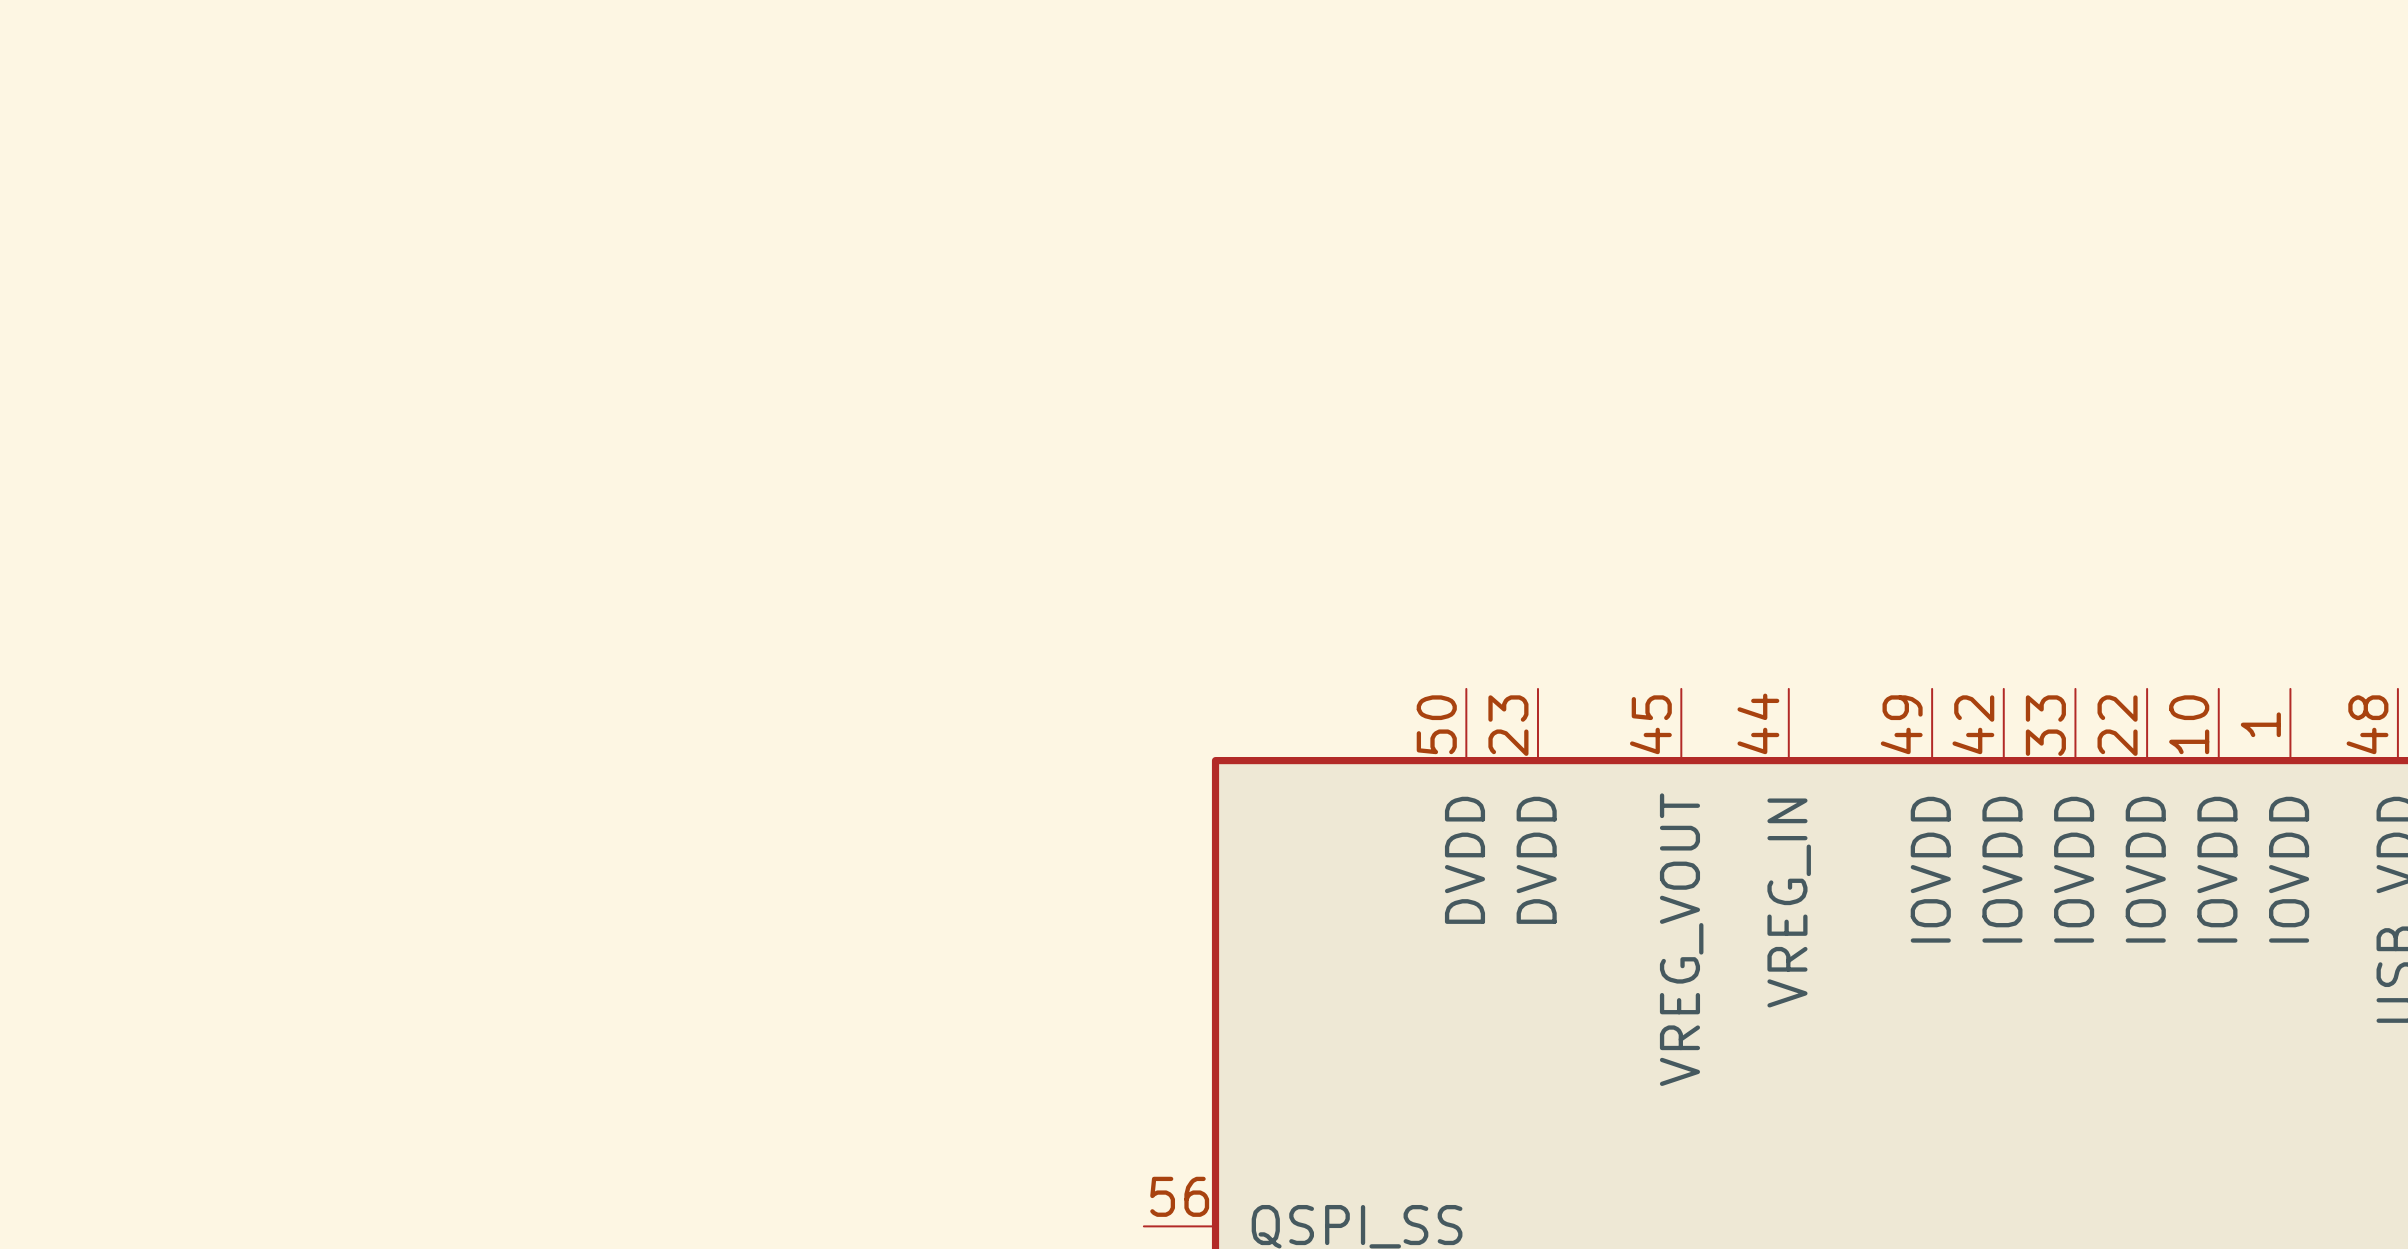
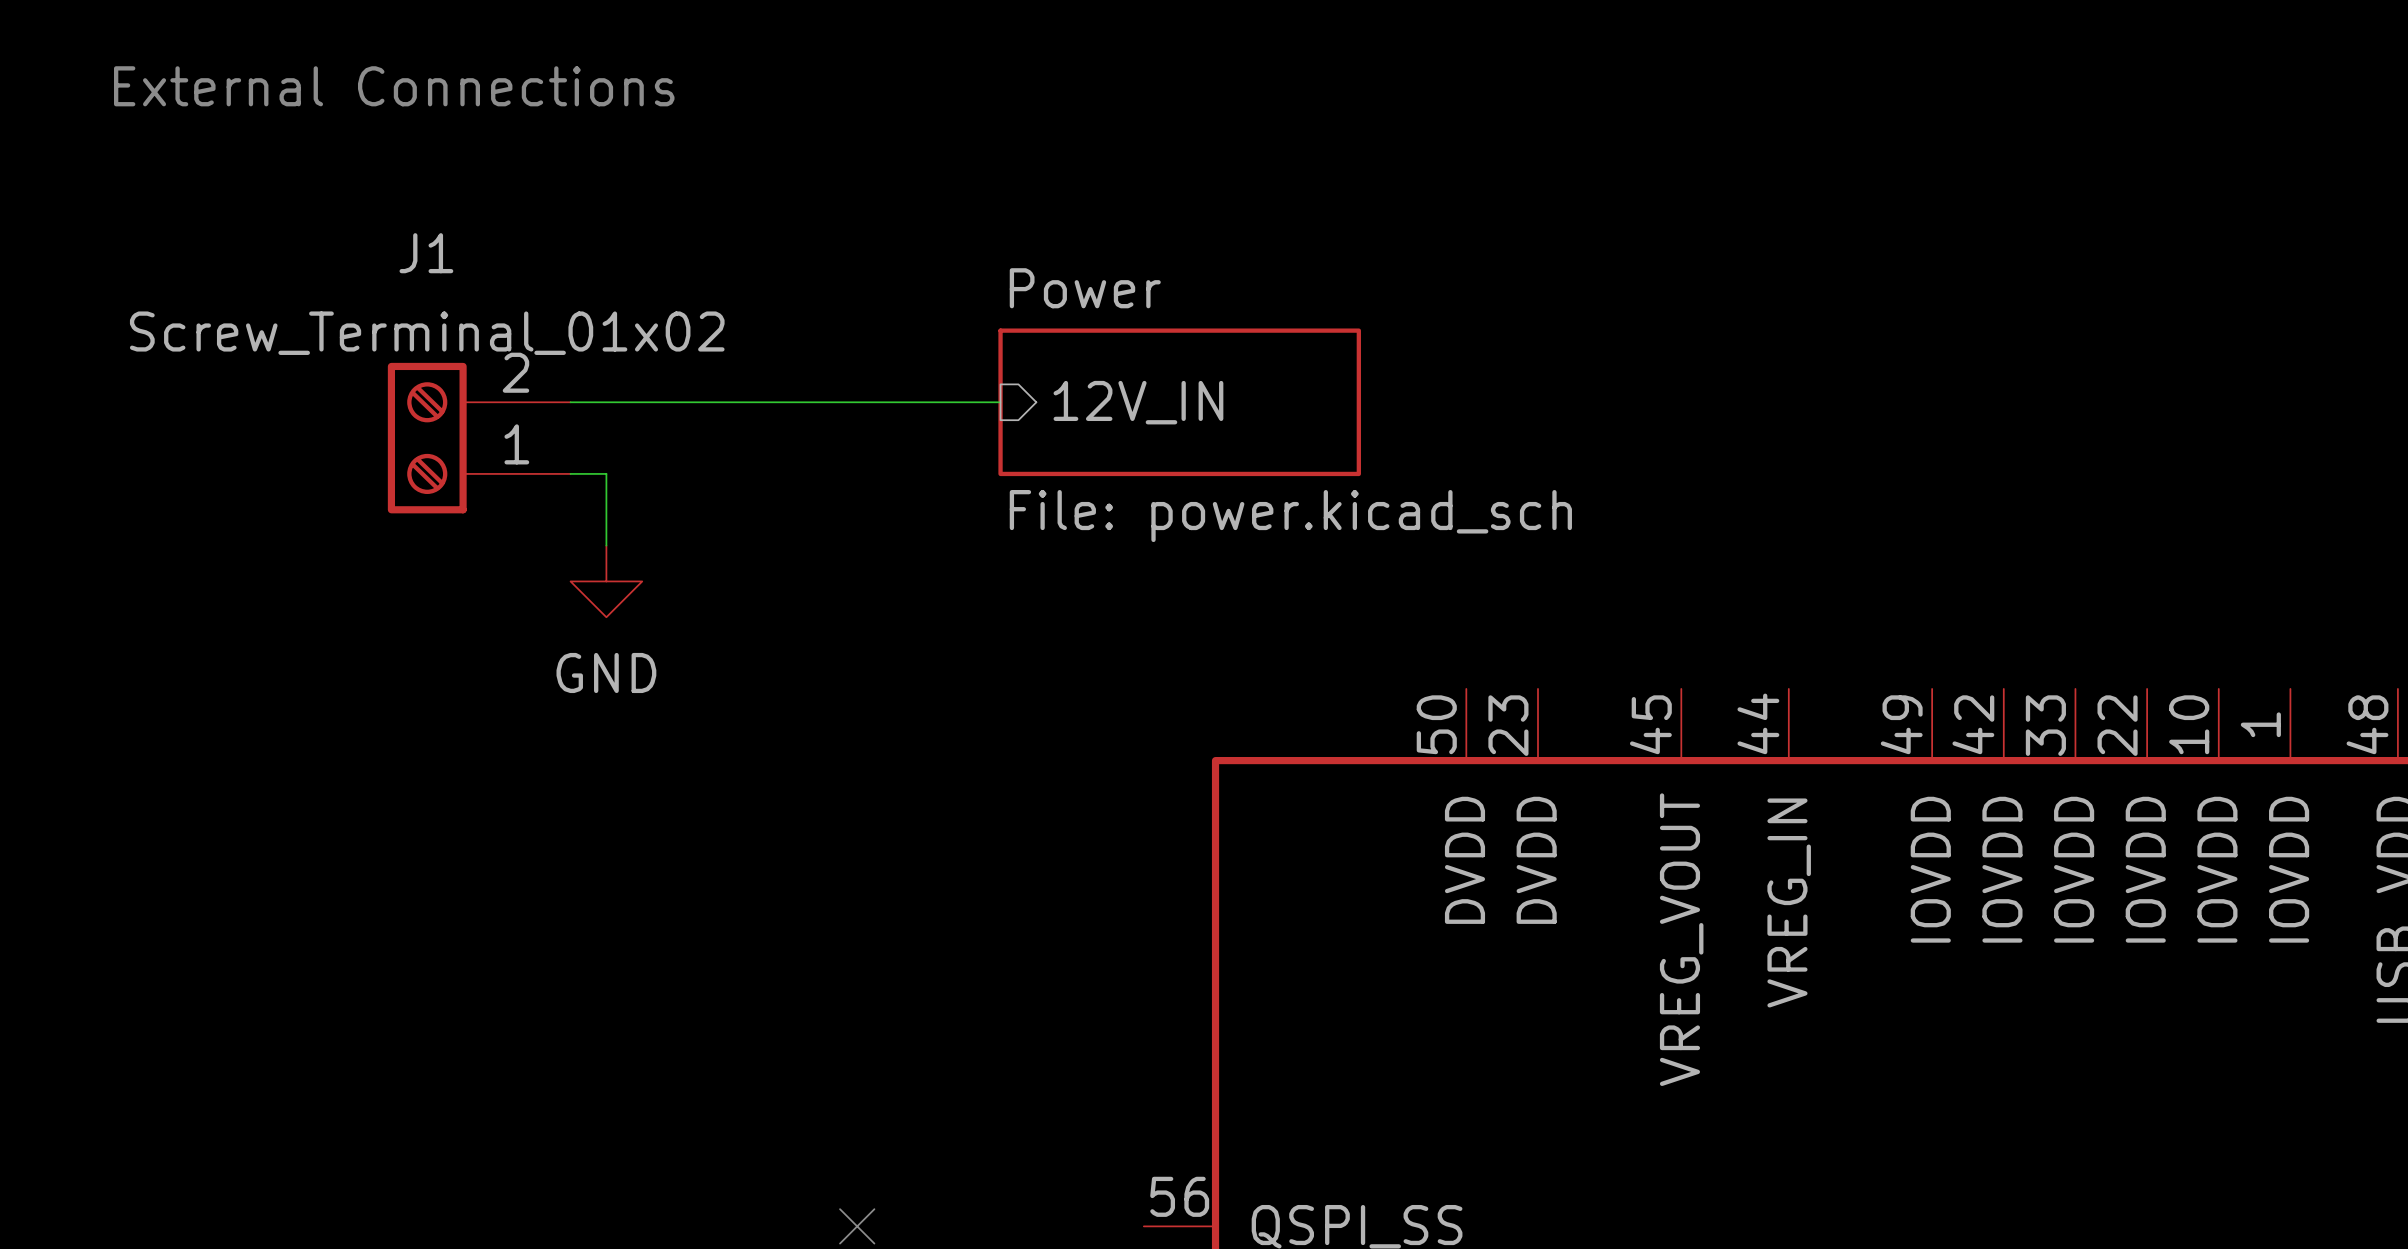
text: none -> External Connections (394, 86)
wire: none -> (570, 402) (1000, 402)
sheet pin: none -> 12V_IN (1138, 402)
sheet Power: none -> File: power.kicad_sch (1179, 402)
J1: none -> Screw_Terminal_01x02 (479, 438)
wire: none -> (570, 473) (606, 473) (606, 545)
power symbol: none -> GND (606, 581)
no-connect mark: none -> (857, 1226)

